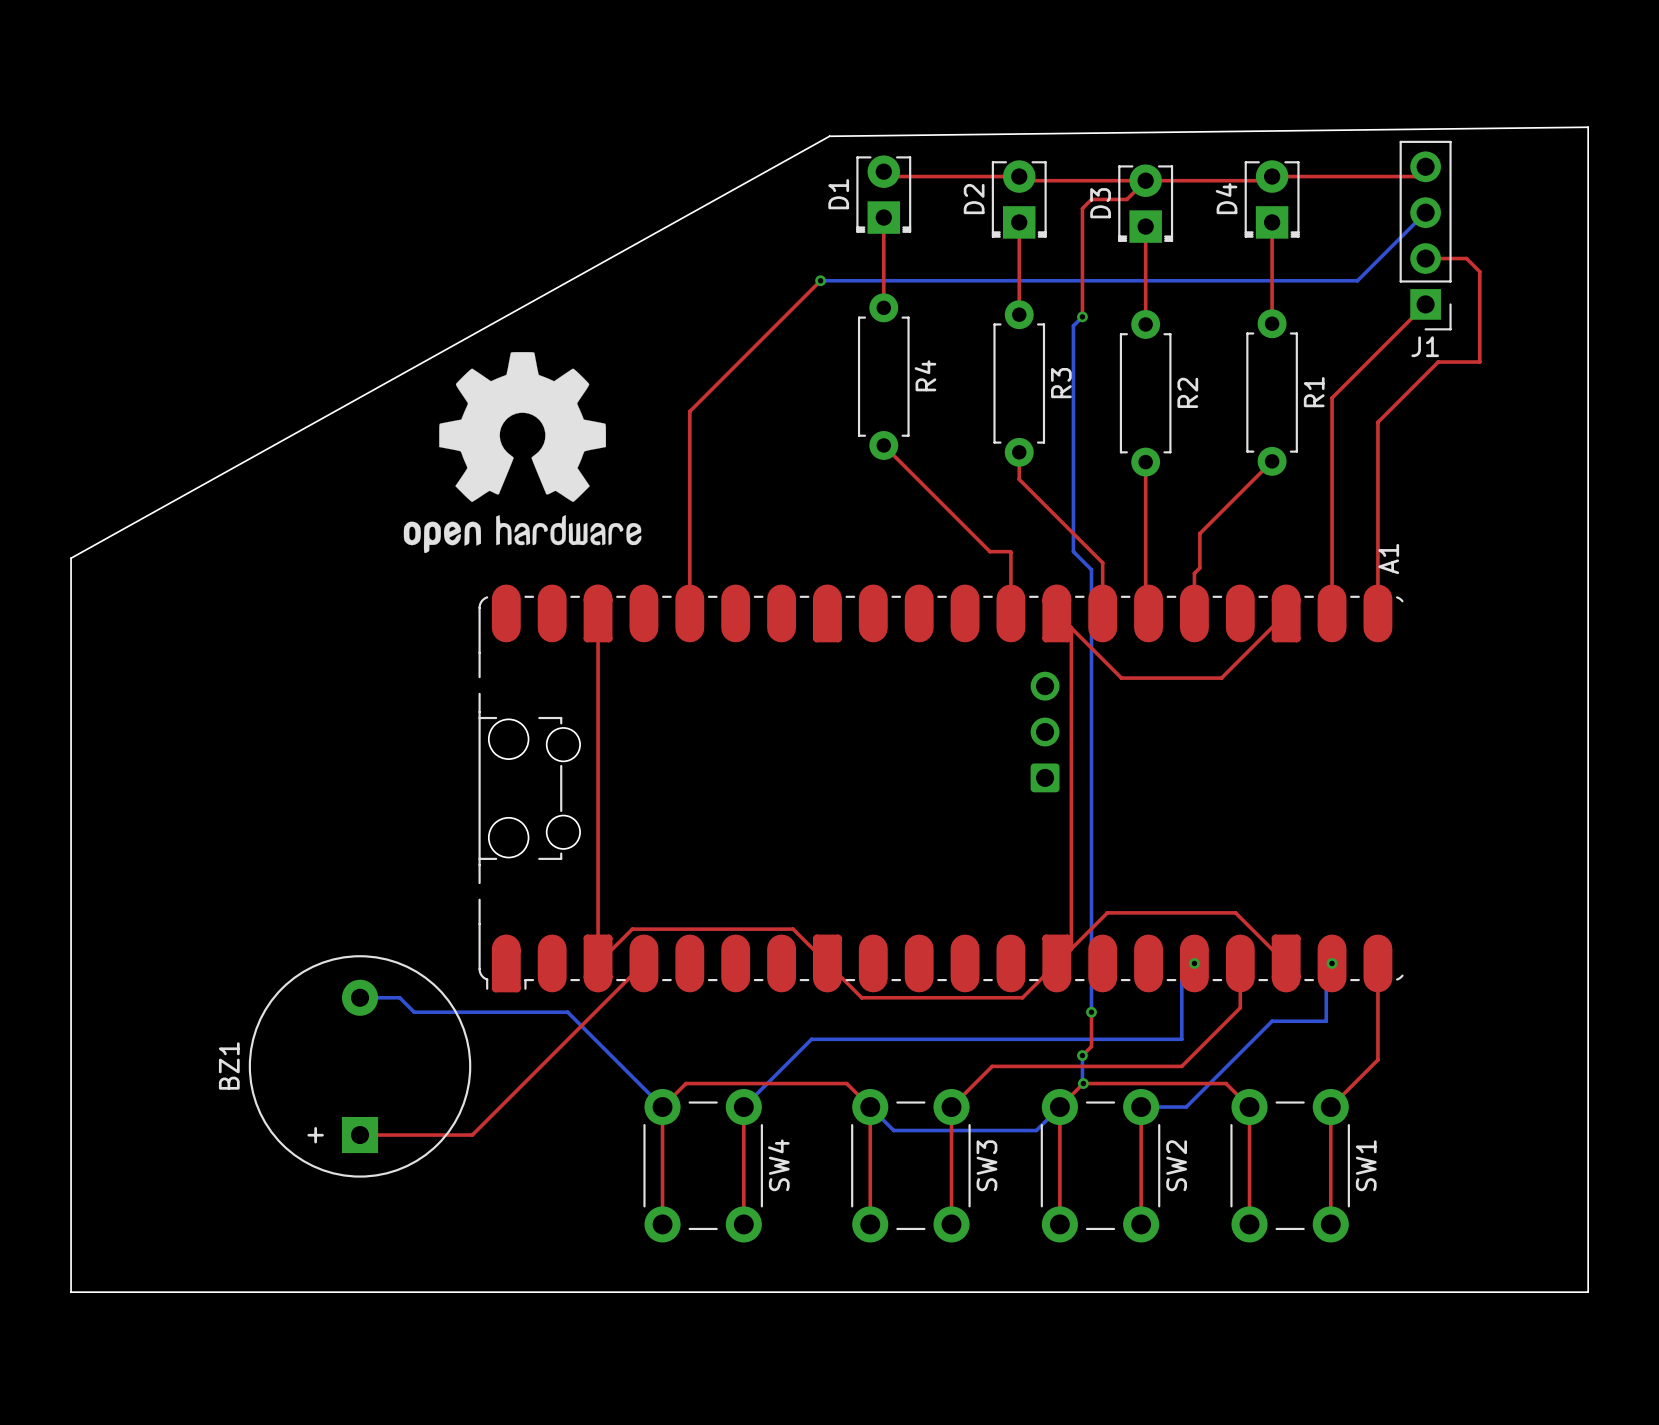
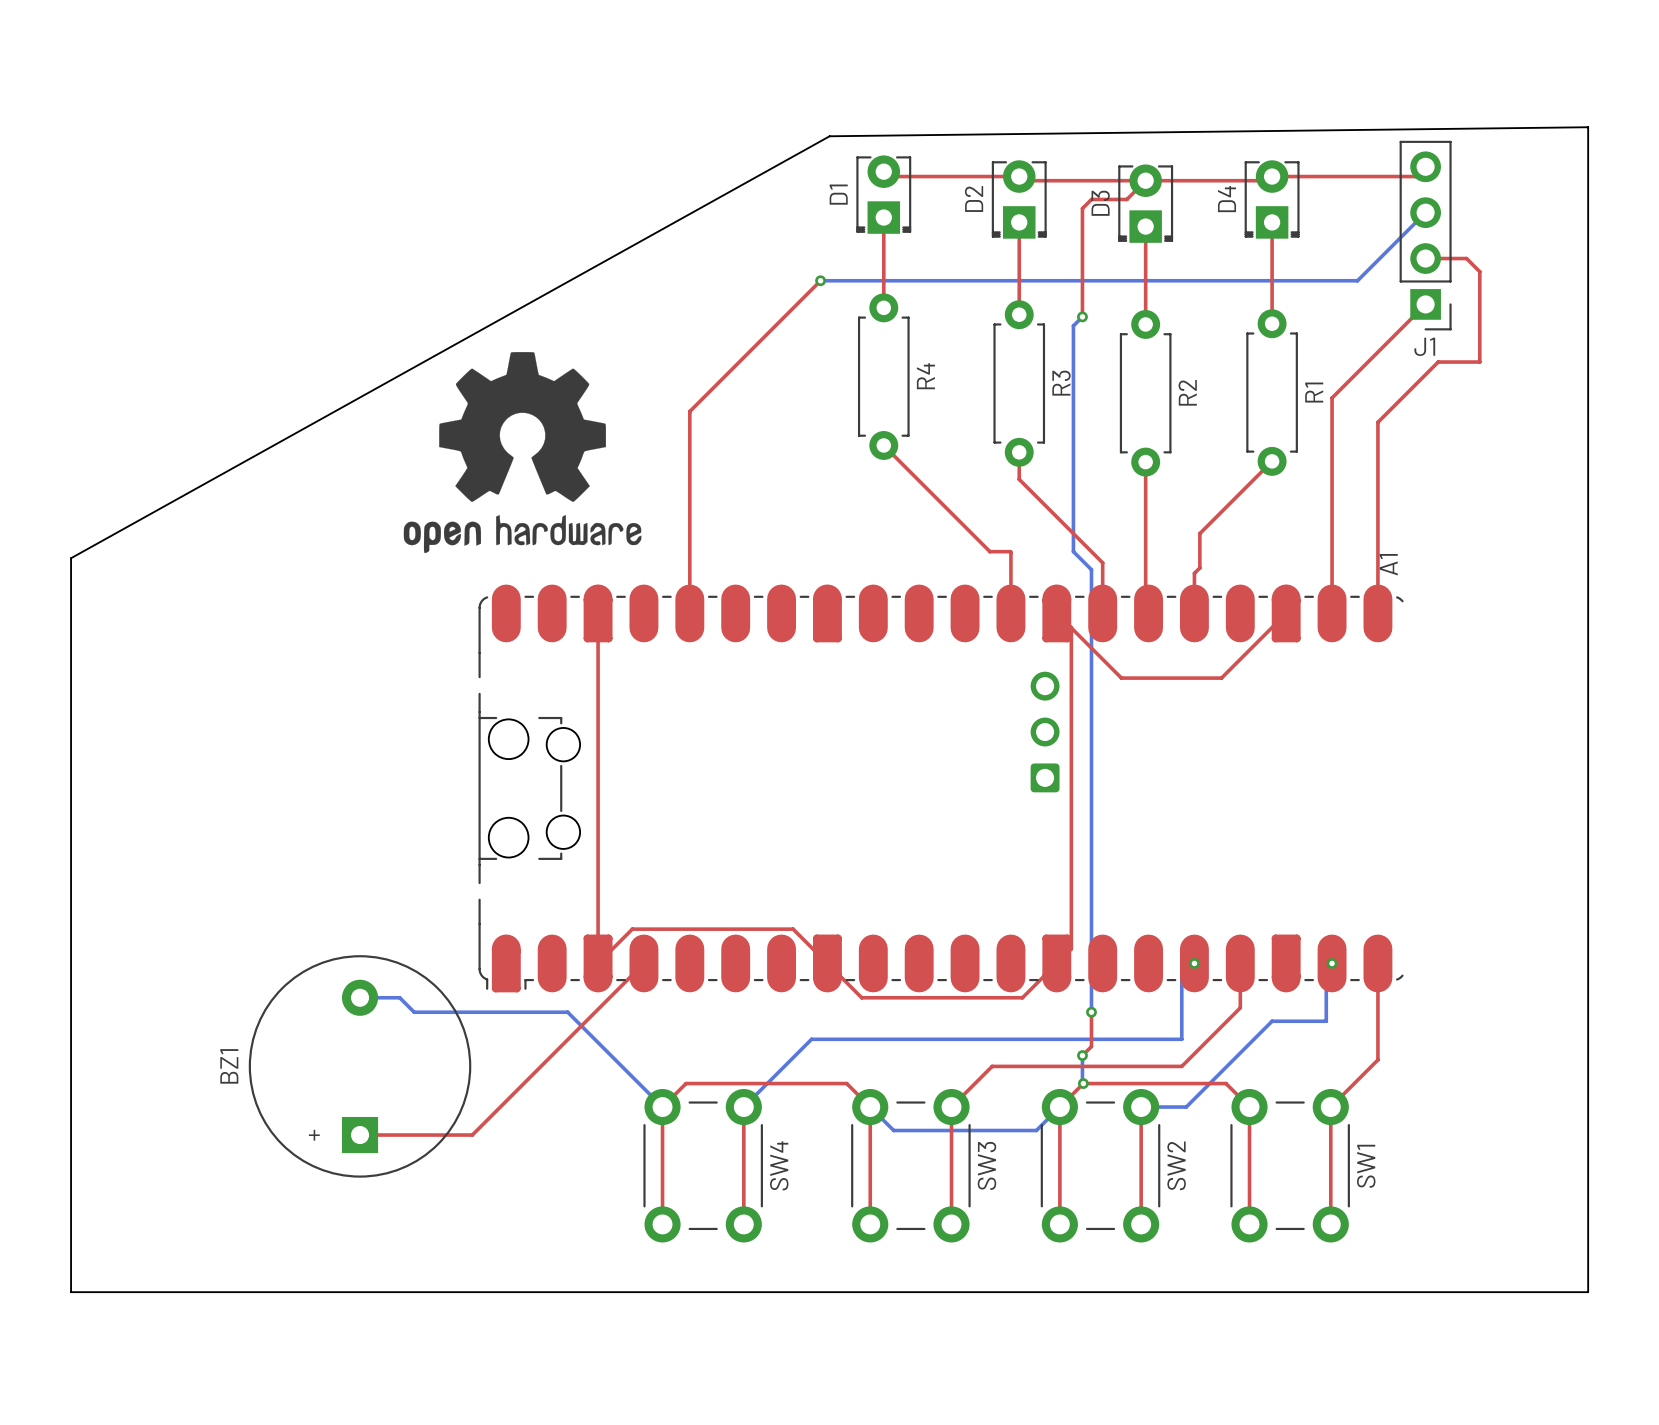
top track: (1071, 948) (1107, 912) (1235, 912) (1286, 963) -> none

